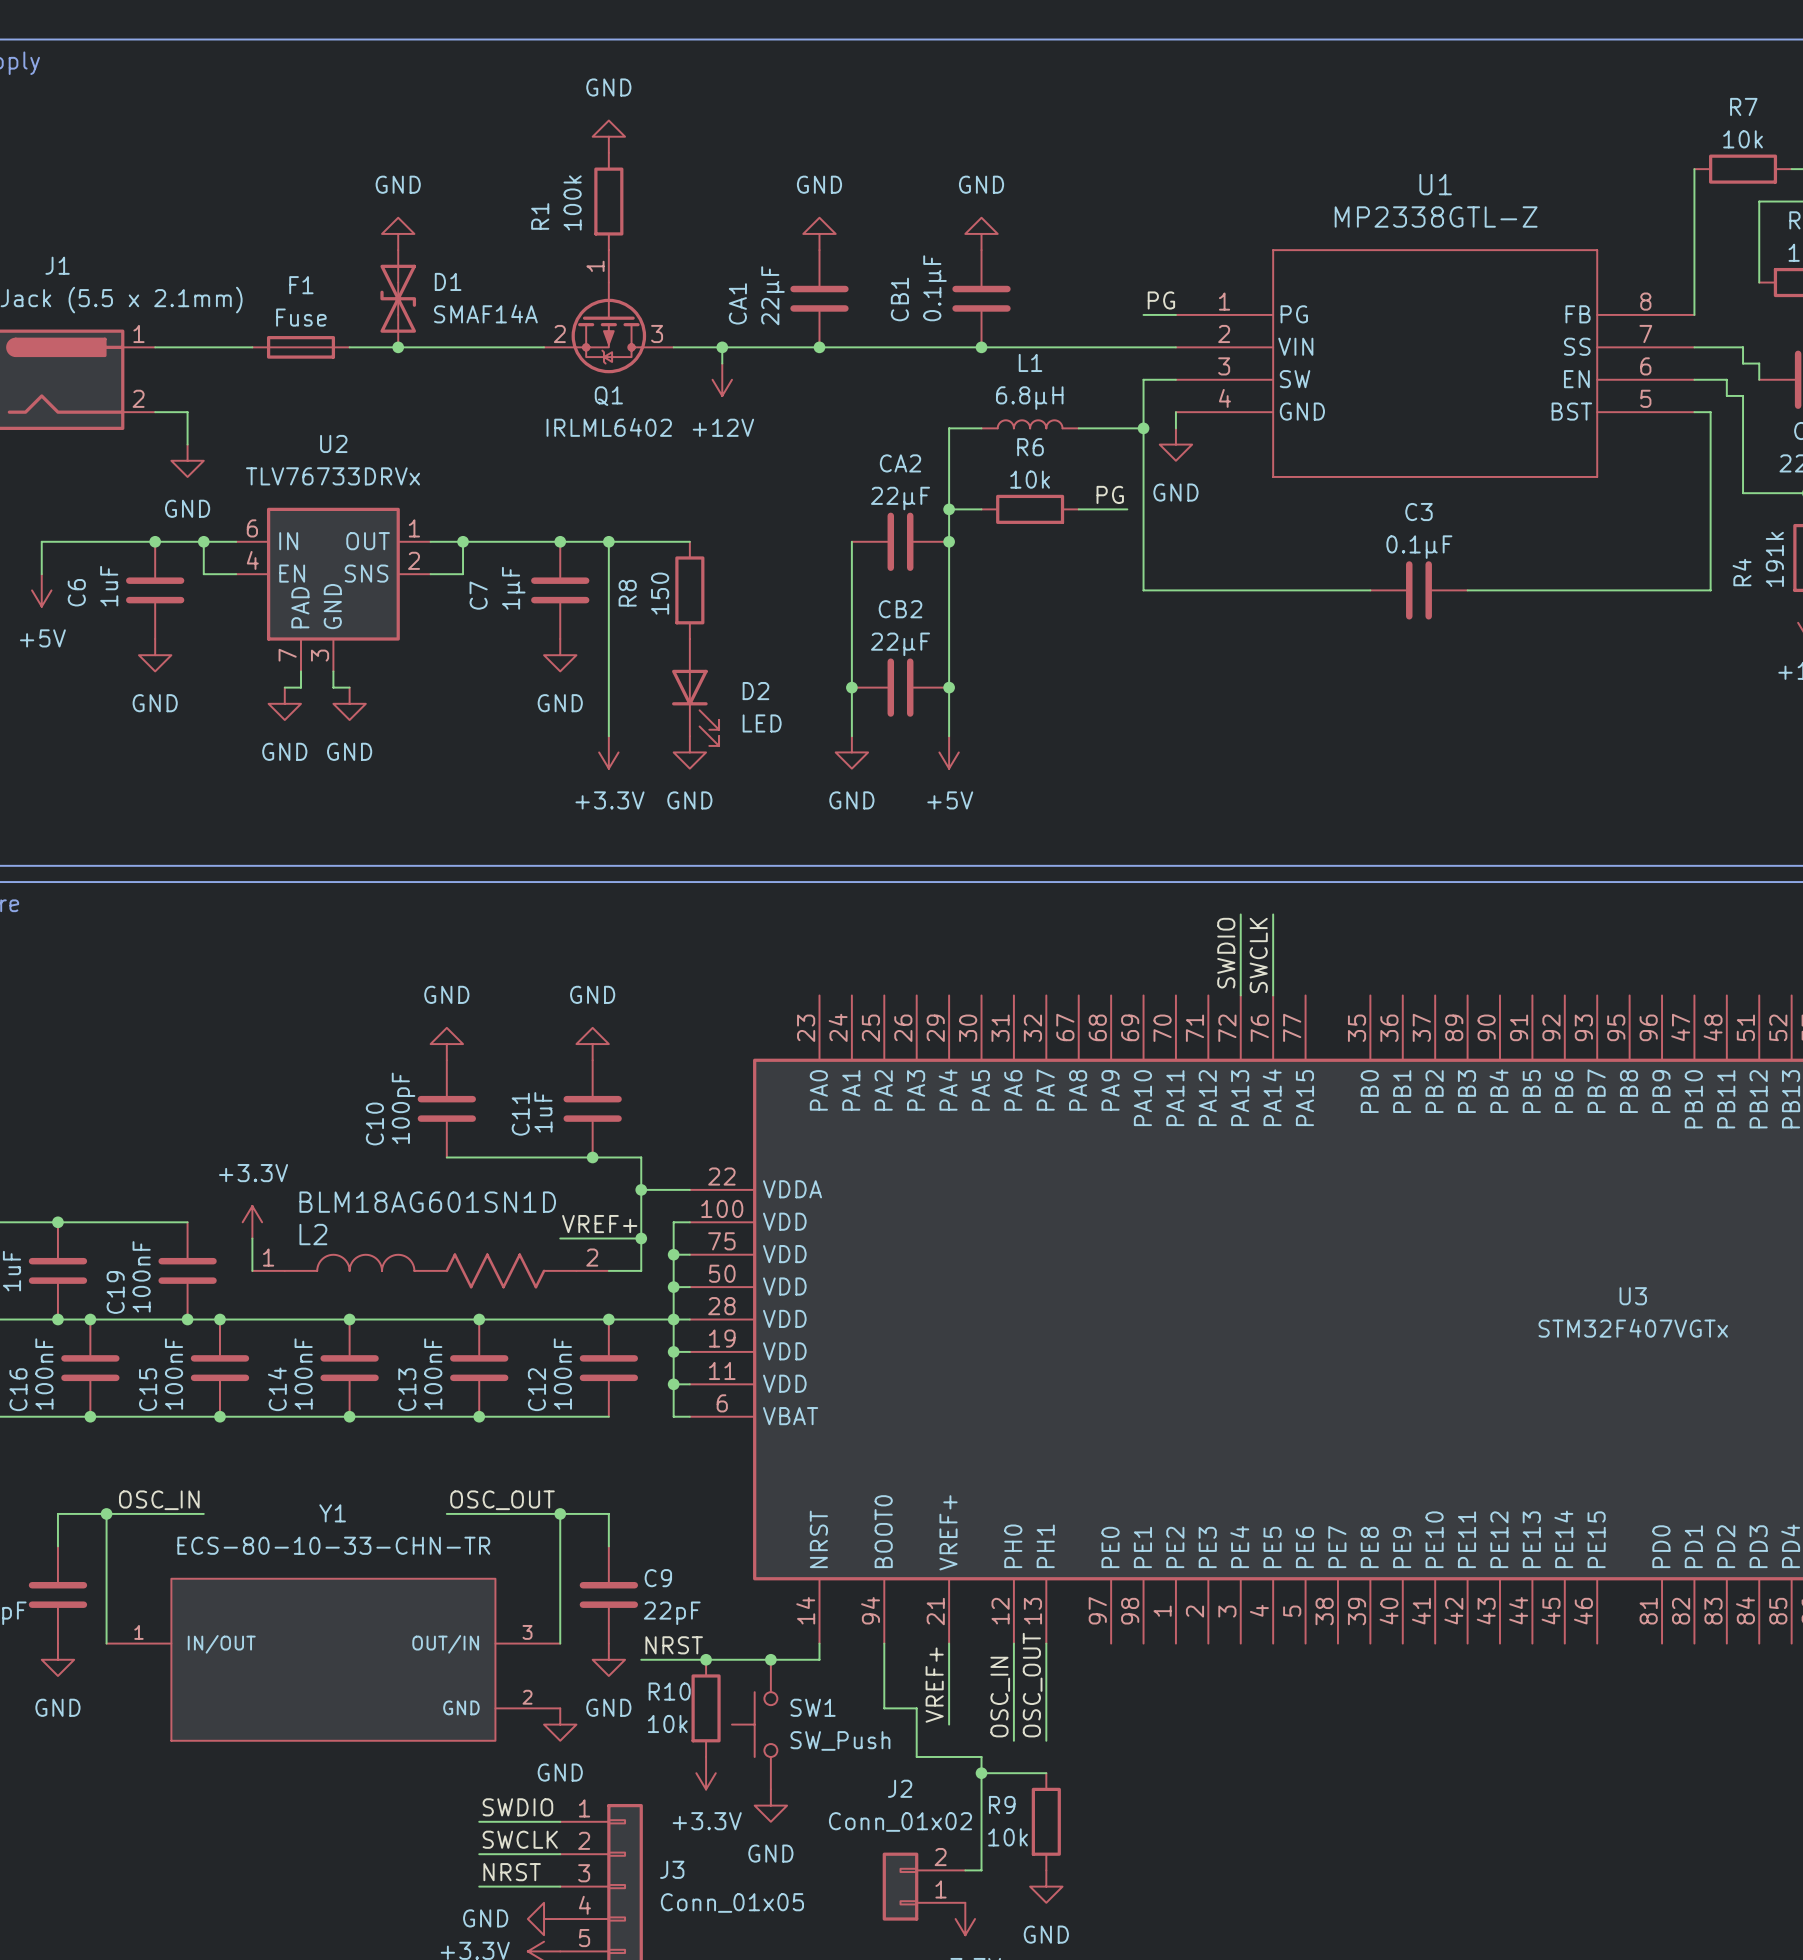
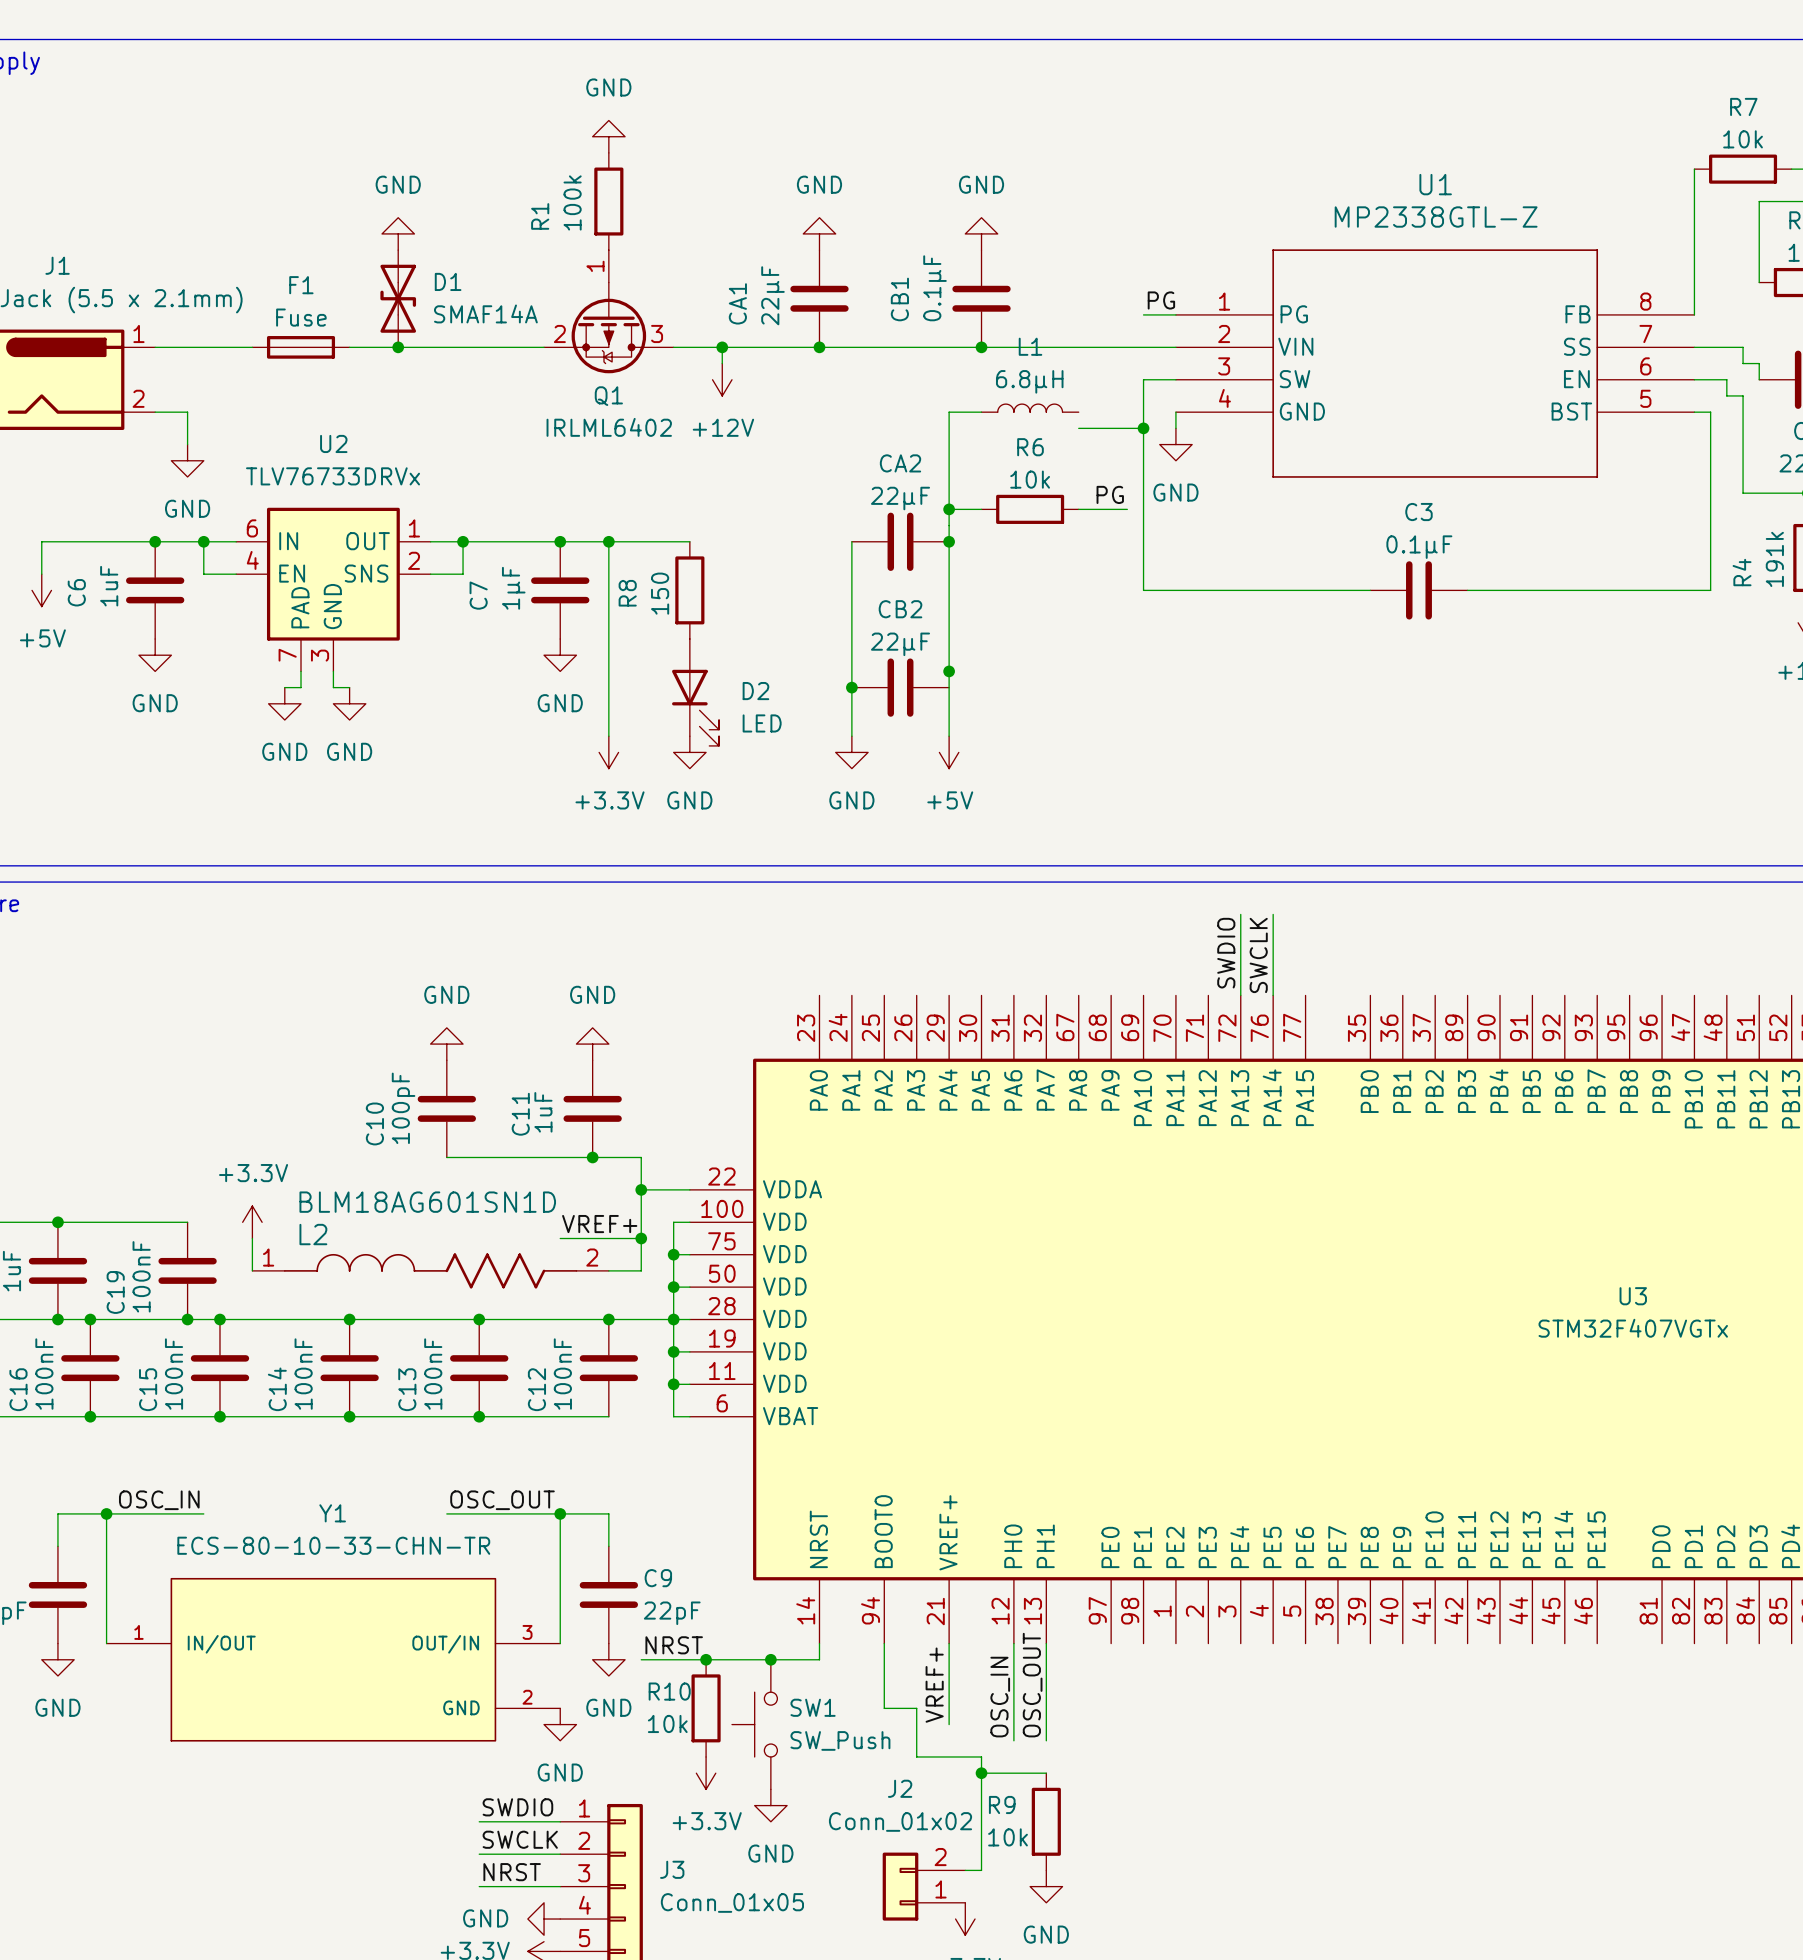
L1 position: (1030, 424) -> (1030, 408)
wire: (949, 428) (981, 428) -> (949, 428) (949, 412) (981, 412)
junction position: (949, 687) -> (949, 671)

